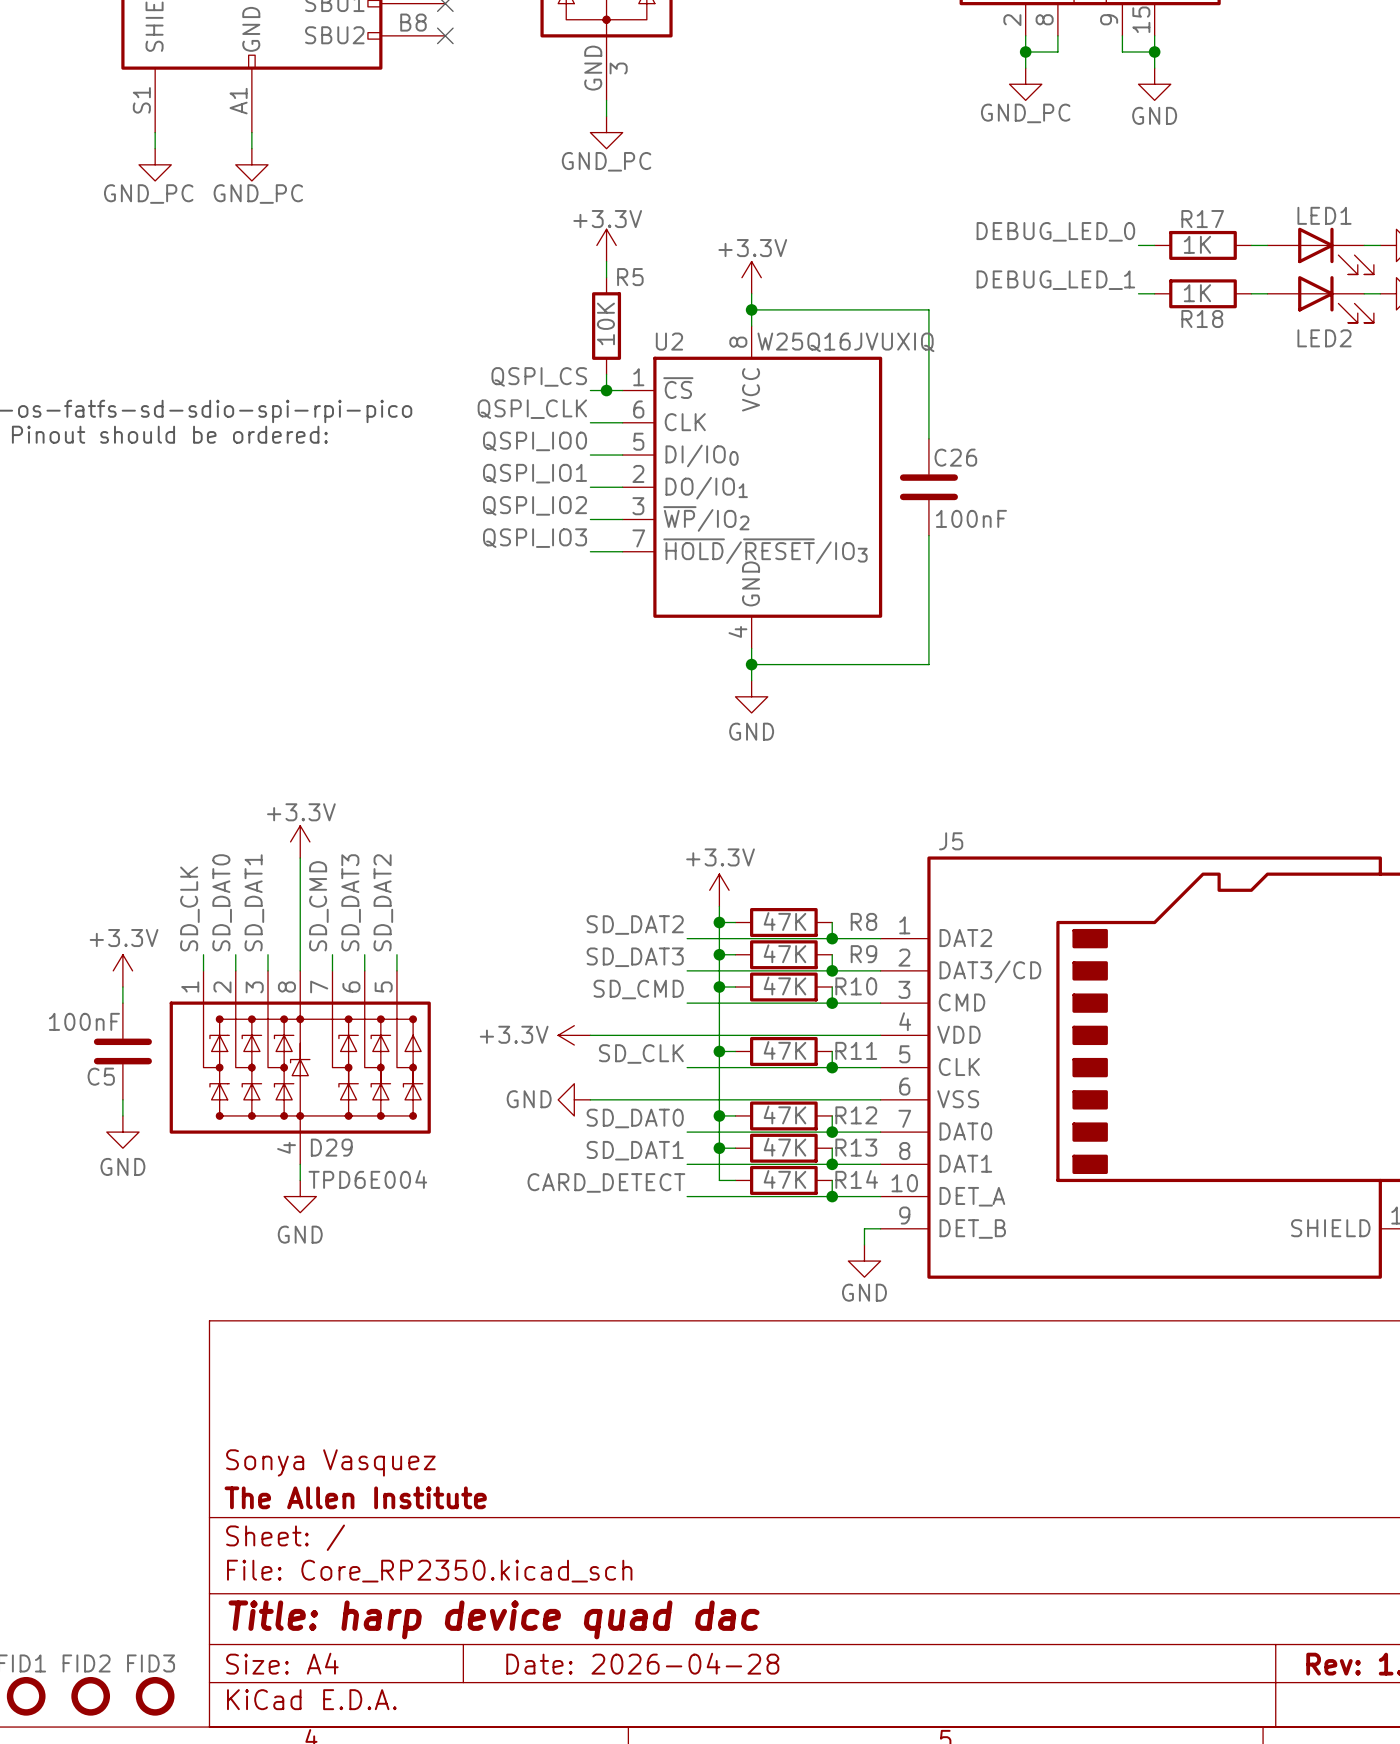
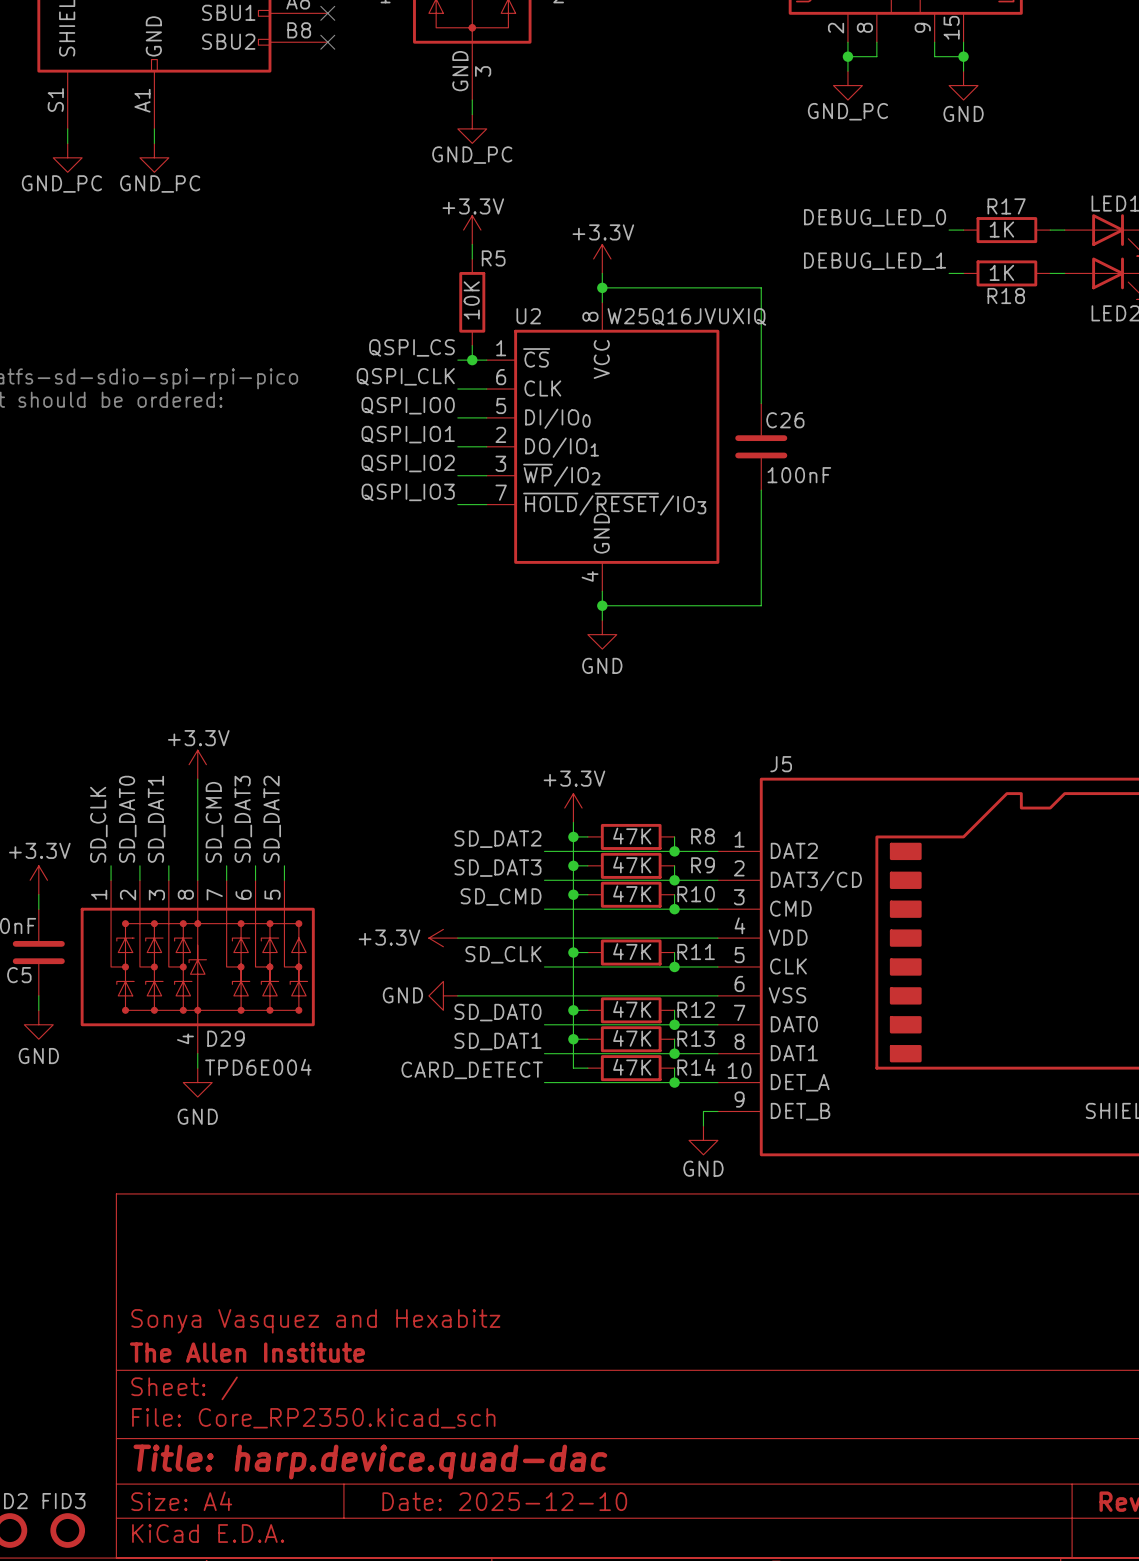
title block: Sonya Vasquez (330, 1462) -> Sonya Vasquez and Hexabitz (315, 1321)
title block: Title: harp device quad dac (494, 1619) -> Title: harp.device.quad-dac (370, 1462)
title block: Date: 2026-04-28 (642, 1663) -> Date: 2025-12-10 (504, 1501)

